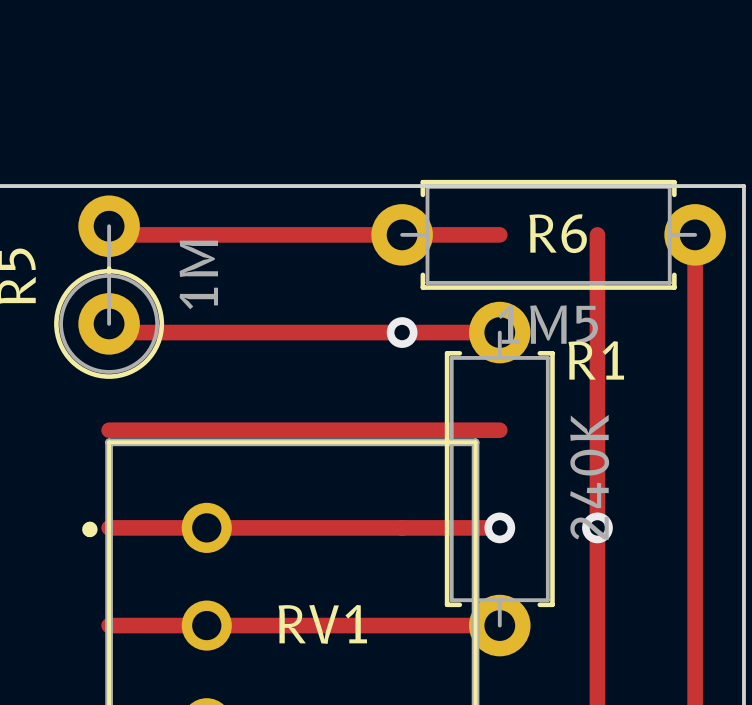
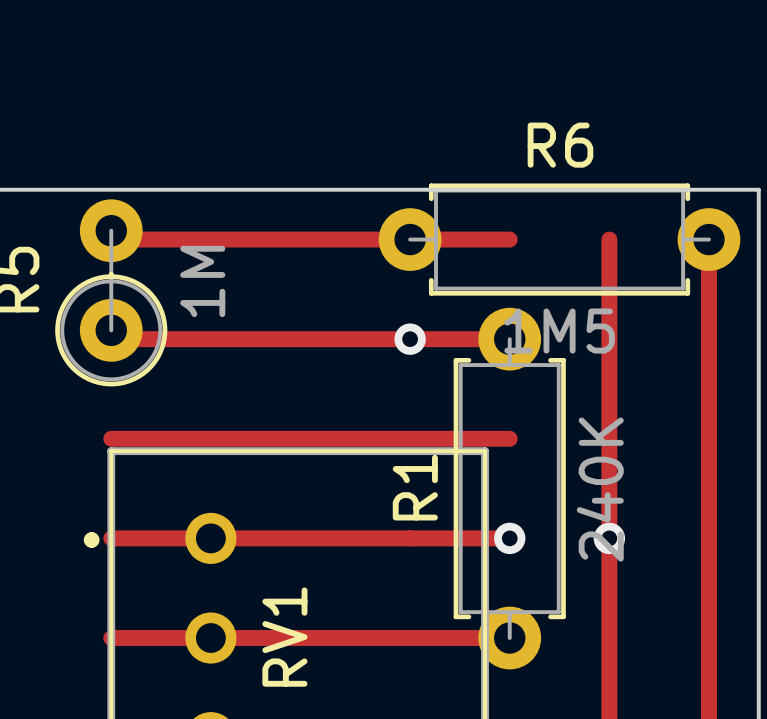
R6 name position: R6 (558, 233) -> R6 (560, 145)
R1 name rotation: 0° (596, 360) -> 90° counterclockwise (415, 487)
R1 name position: R1 (596, 360) -> R1 (415, 487)
RV1 name rotation: 0° (322, 624) -> 90° counterclockwise (284, 637)

